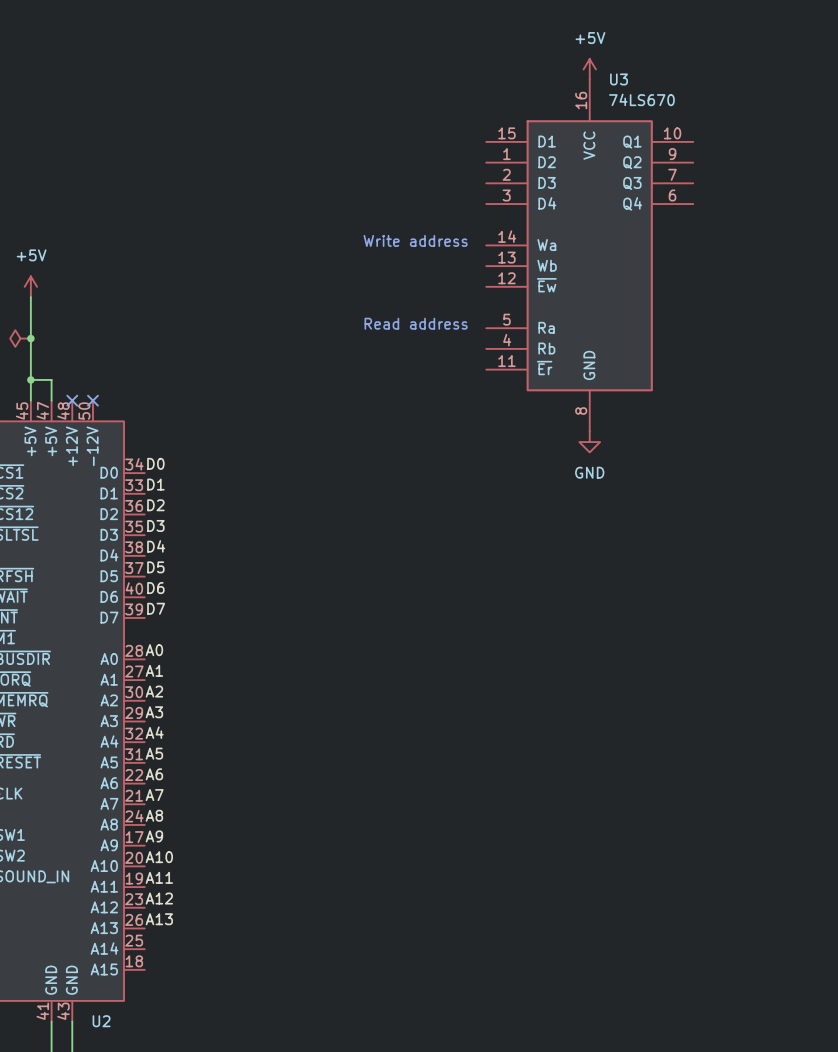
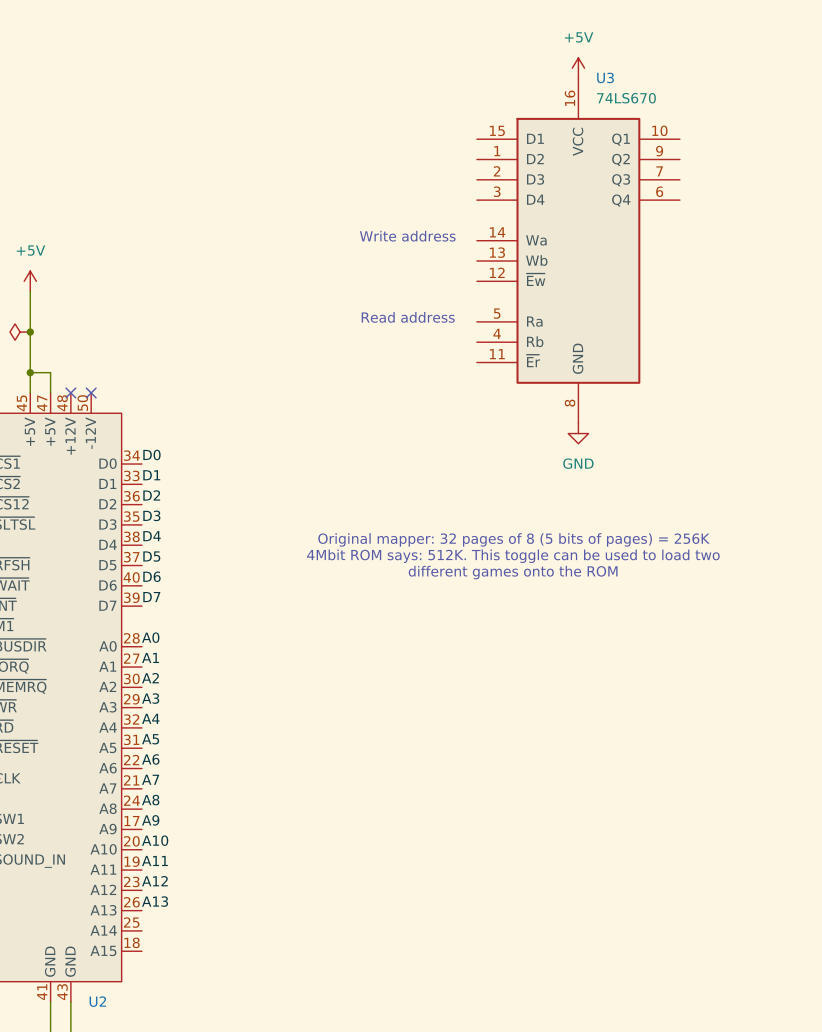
text: none -> Original mapper: 32 pages of 8 (5 bits of pages) = 256K (513, 539)
text: none -> 4Mbit ROM says: 512K. This toggle can be used to load two (513, 556)
text: none -> different games onto the ROM (513, 572)

